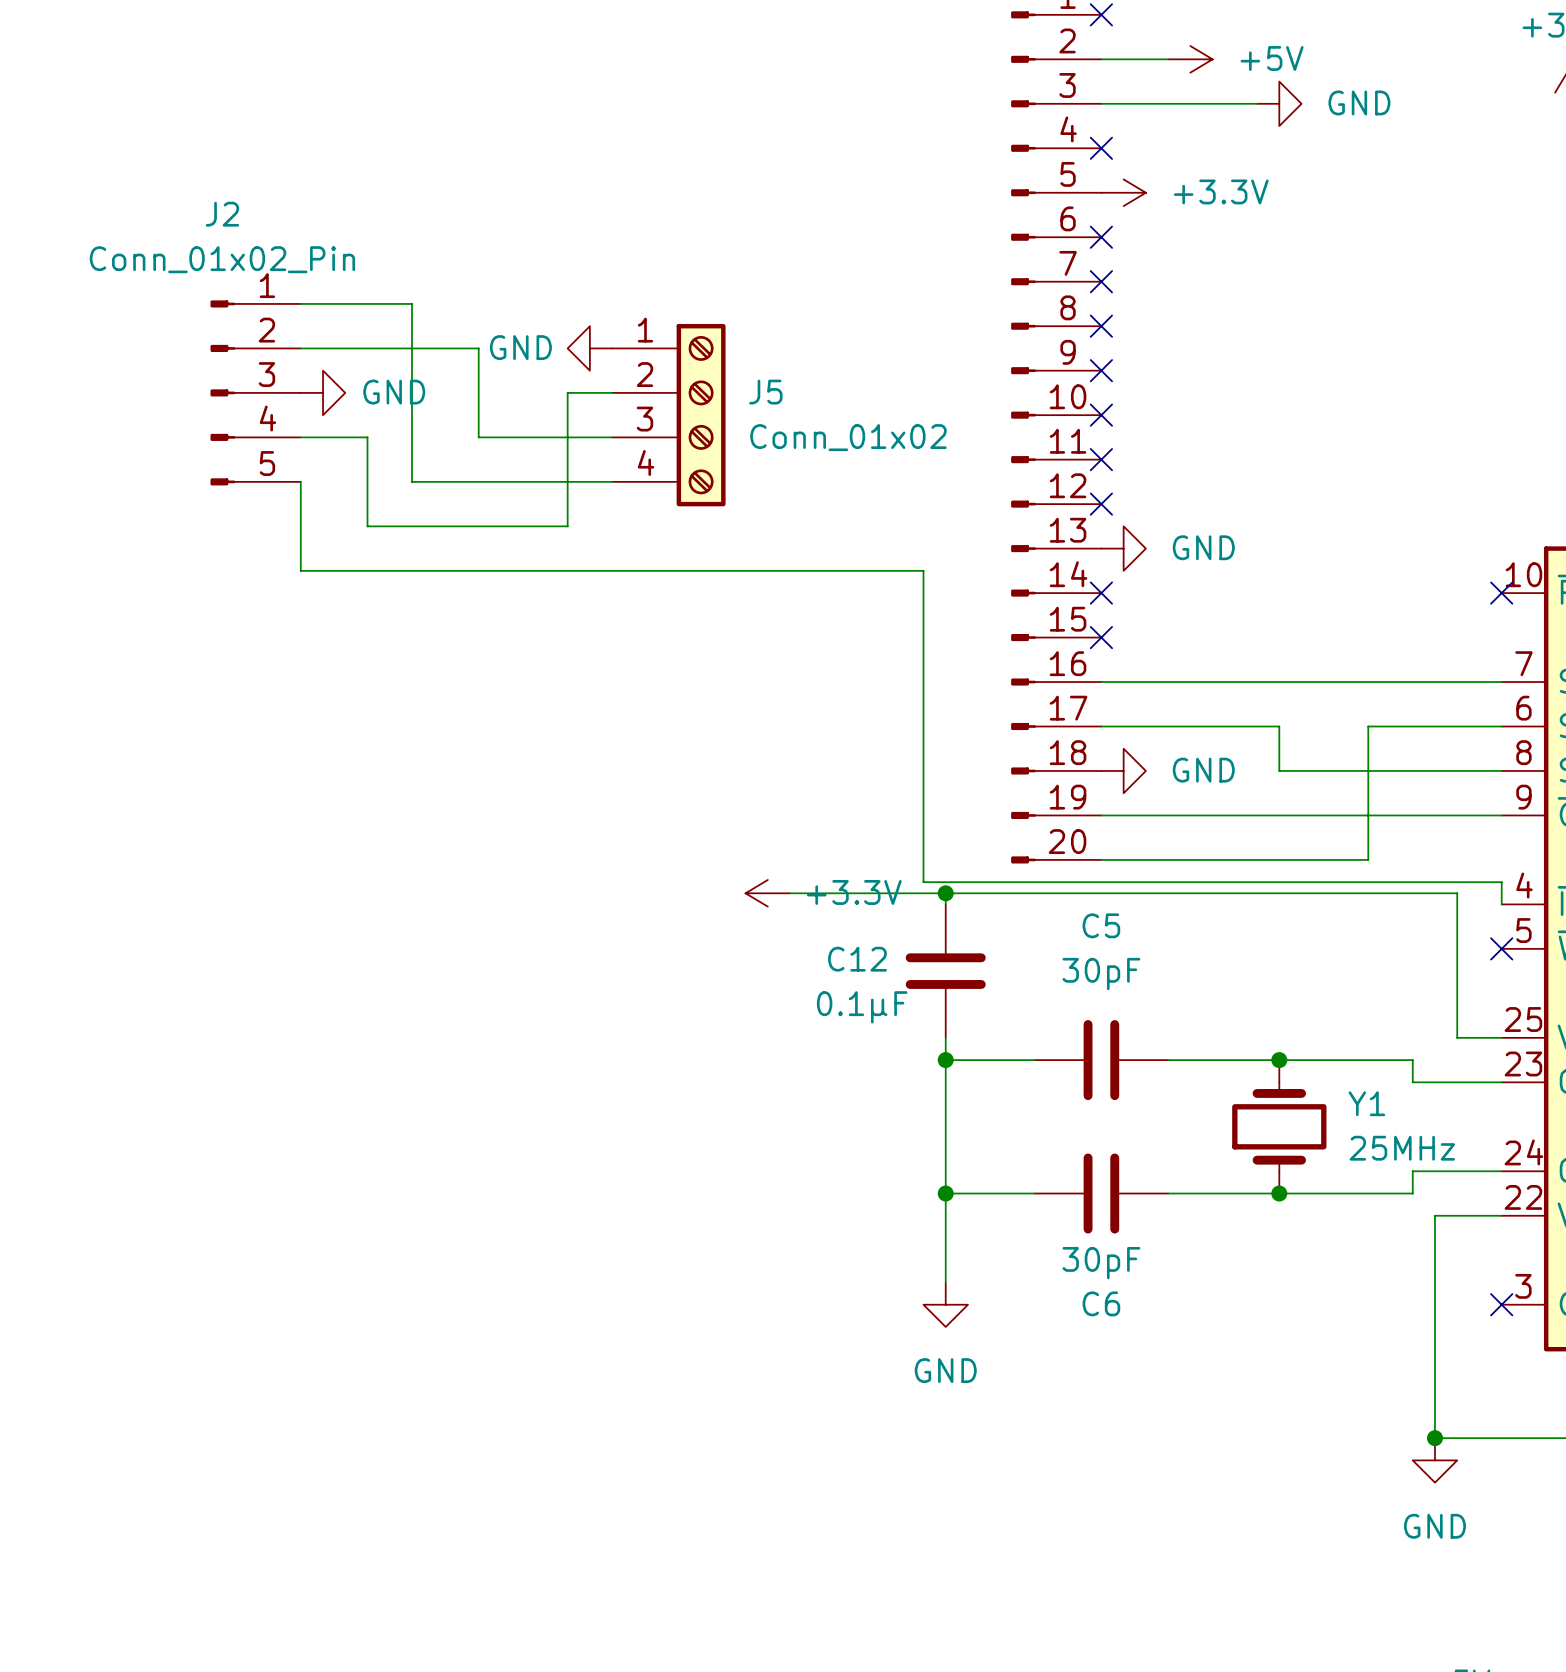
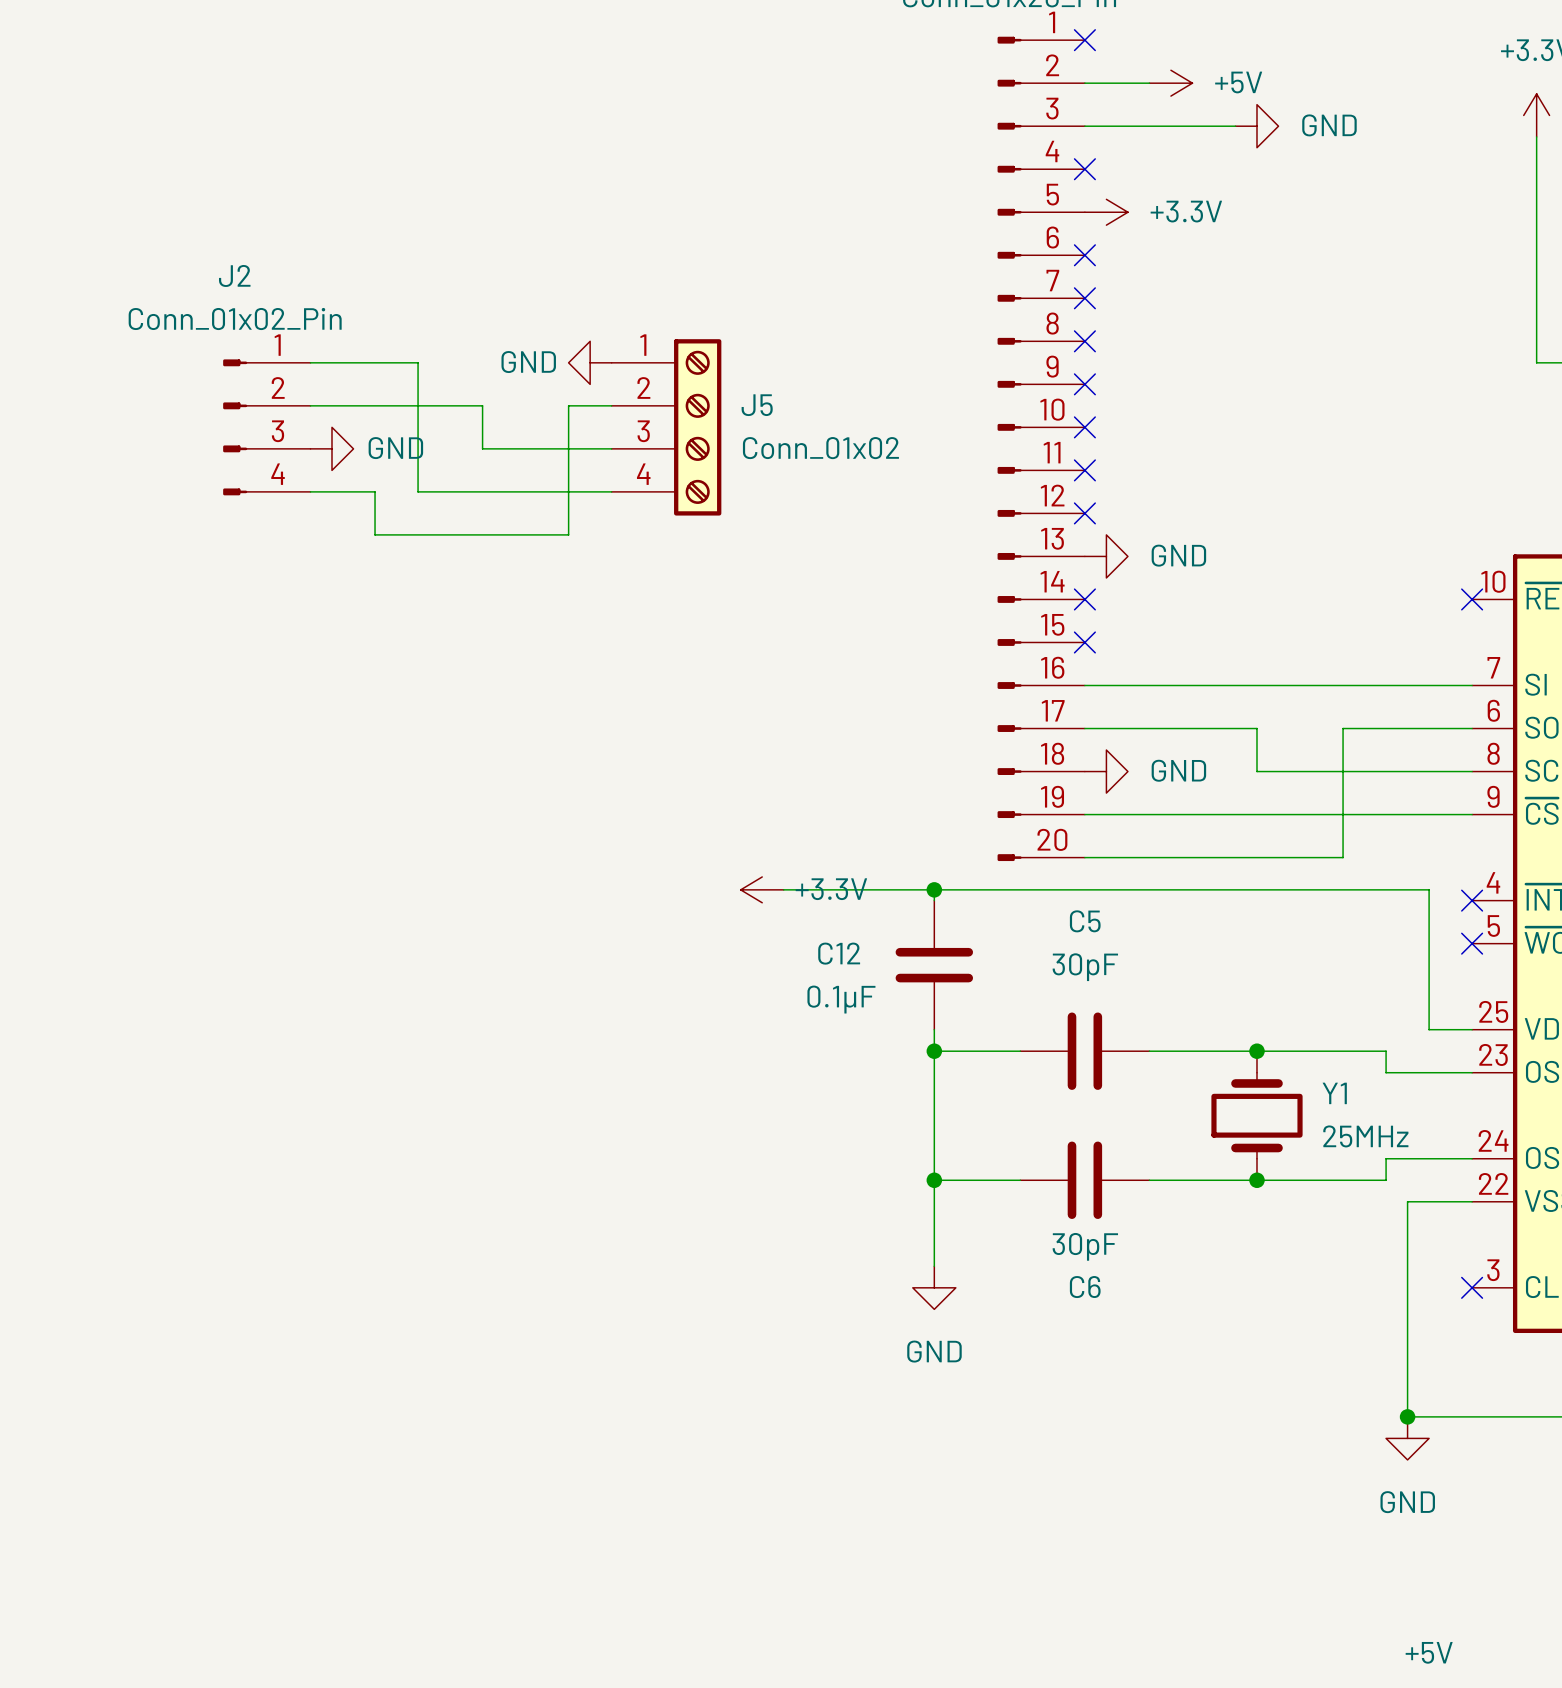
J2 symbol: [210, 300, 301, 486] -> [223, 359, 311, 496]
wire: (300, 303) (411, 303) (411, 348) (478, 348) (478, 392) -> (310, 405) (482, 405)
power symbol position: GND (323, 392) -> GND (331, 448)
wire: (300, 437) (367, 437) (367, 481) -> (310, 491) (375, 491)
wire: (300, 481) (300, 570) (923, 570) (923, 882) (1501, 882) (1501, 904) -> none
no-connect mark: none -> (1472, 900)

